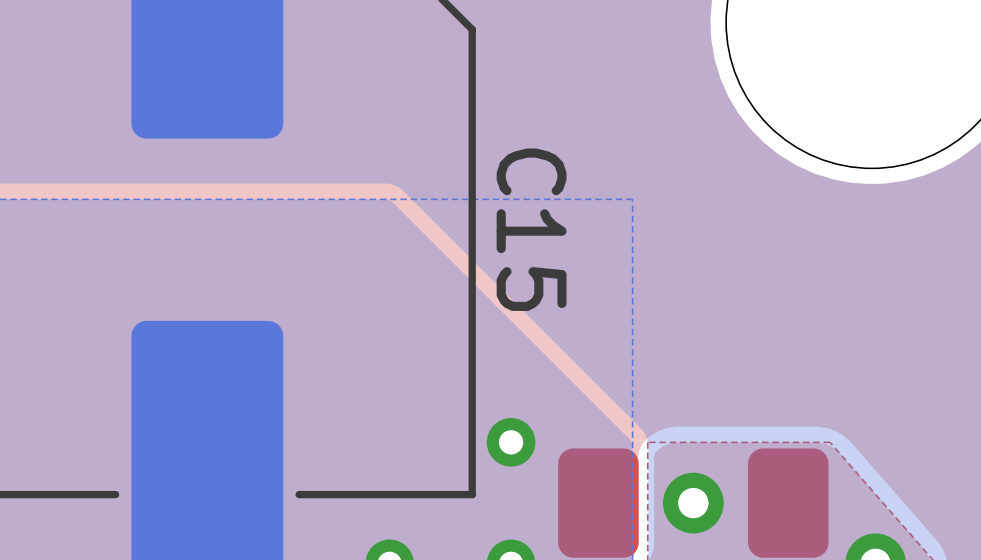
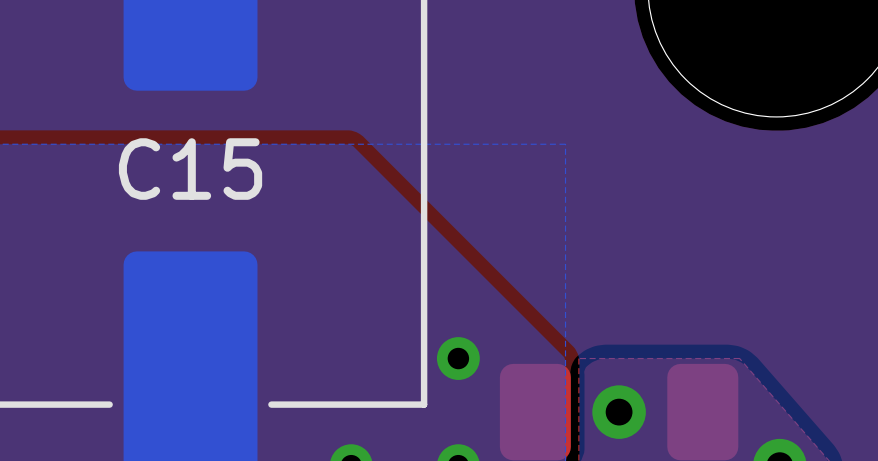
C15 name rotation: 0° (531, 229) -> 90° counterclockwise (190, 169)
C15 name position: C15 (531, 229) -> C15 (190, 169)

